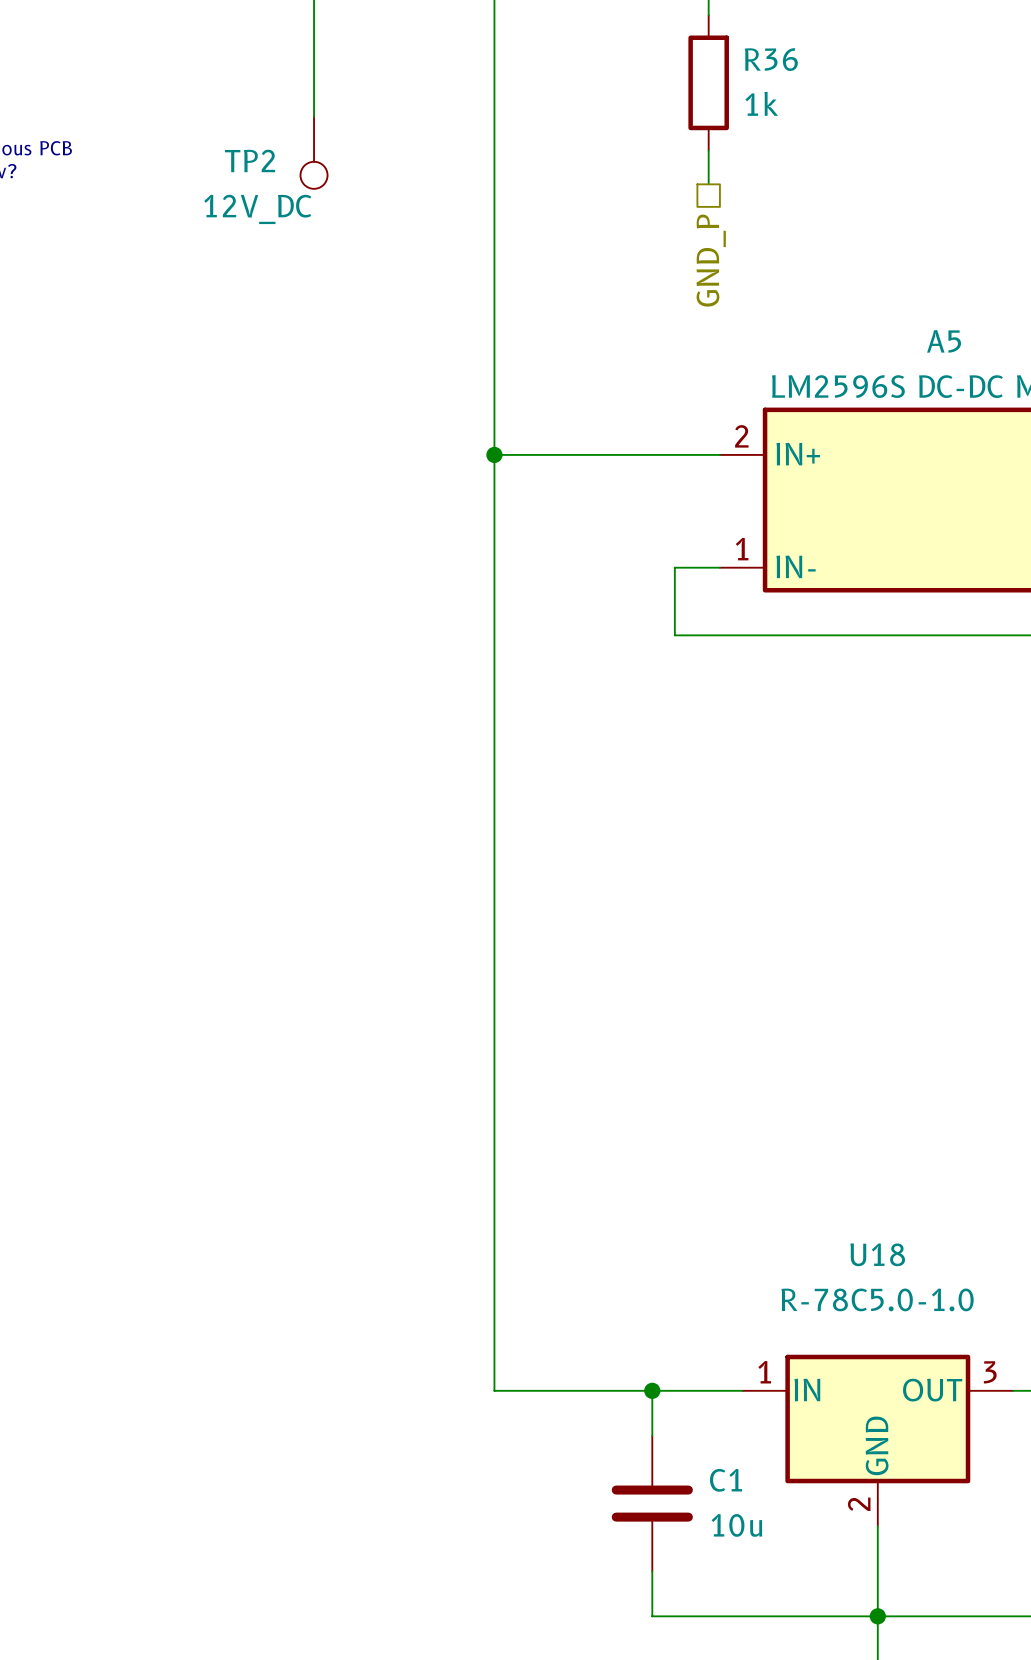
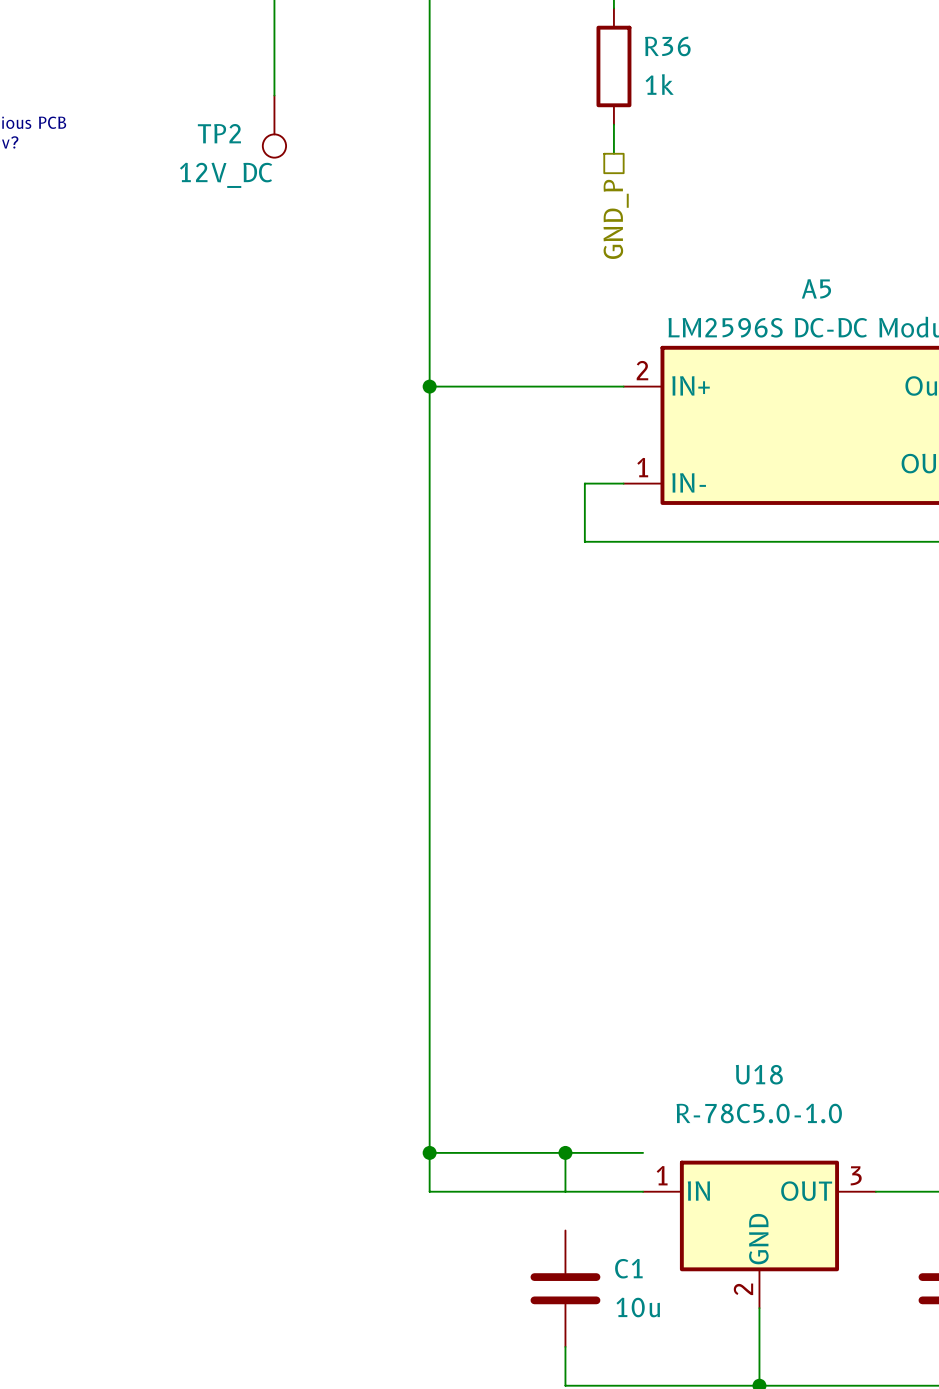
wire: none -> (429, 1152) (643, 1152)
junction: none -> (429, 1152)
wire: (652, 1390) (652, 1435) -> (565, 1191) (565, 1152)
junction position: (652, 1390) -> (565, 1152)

